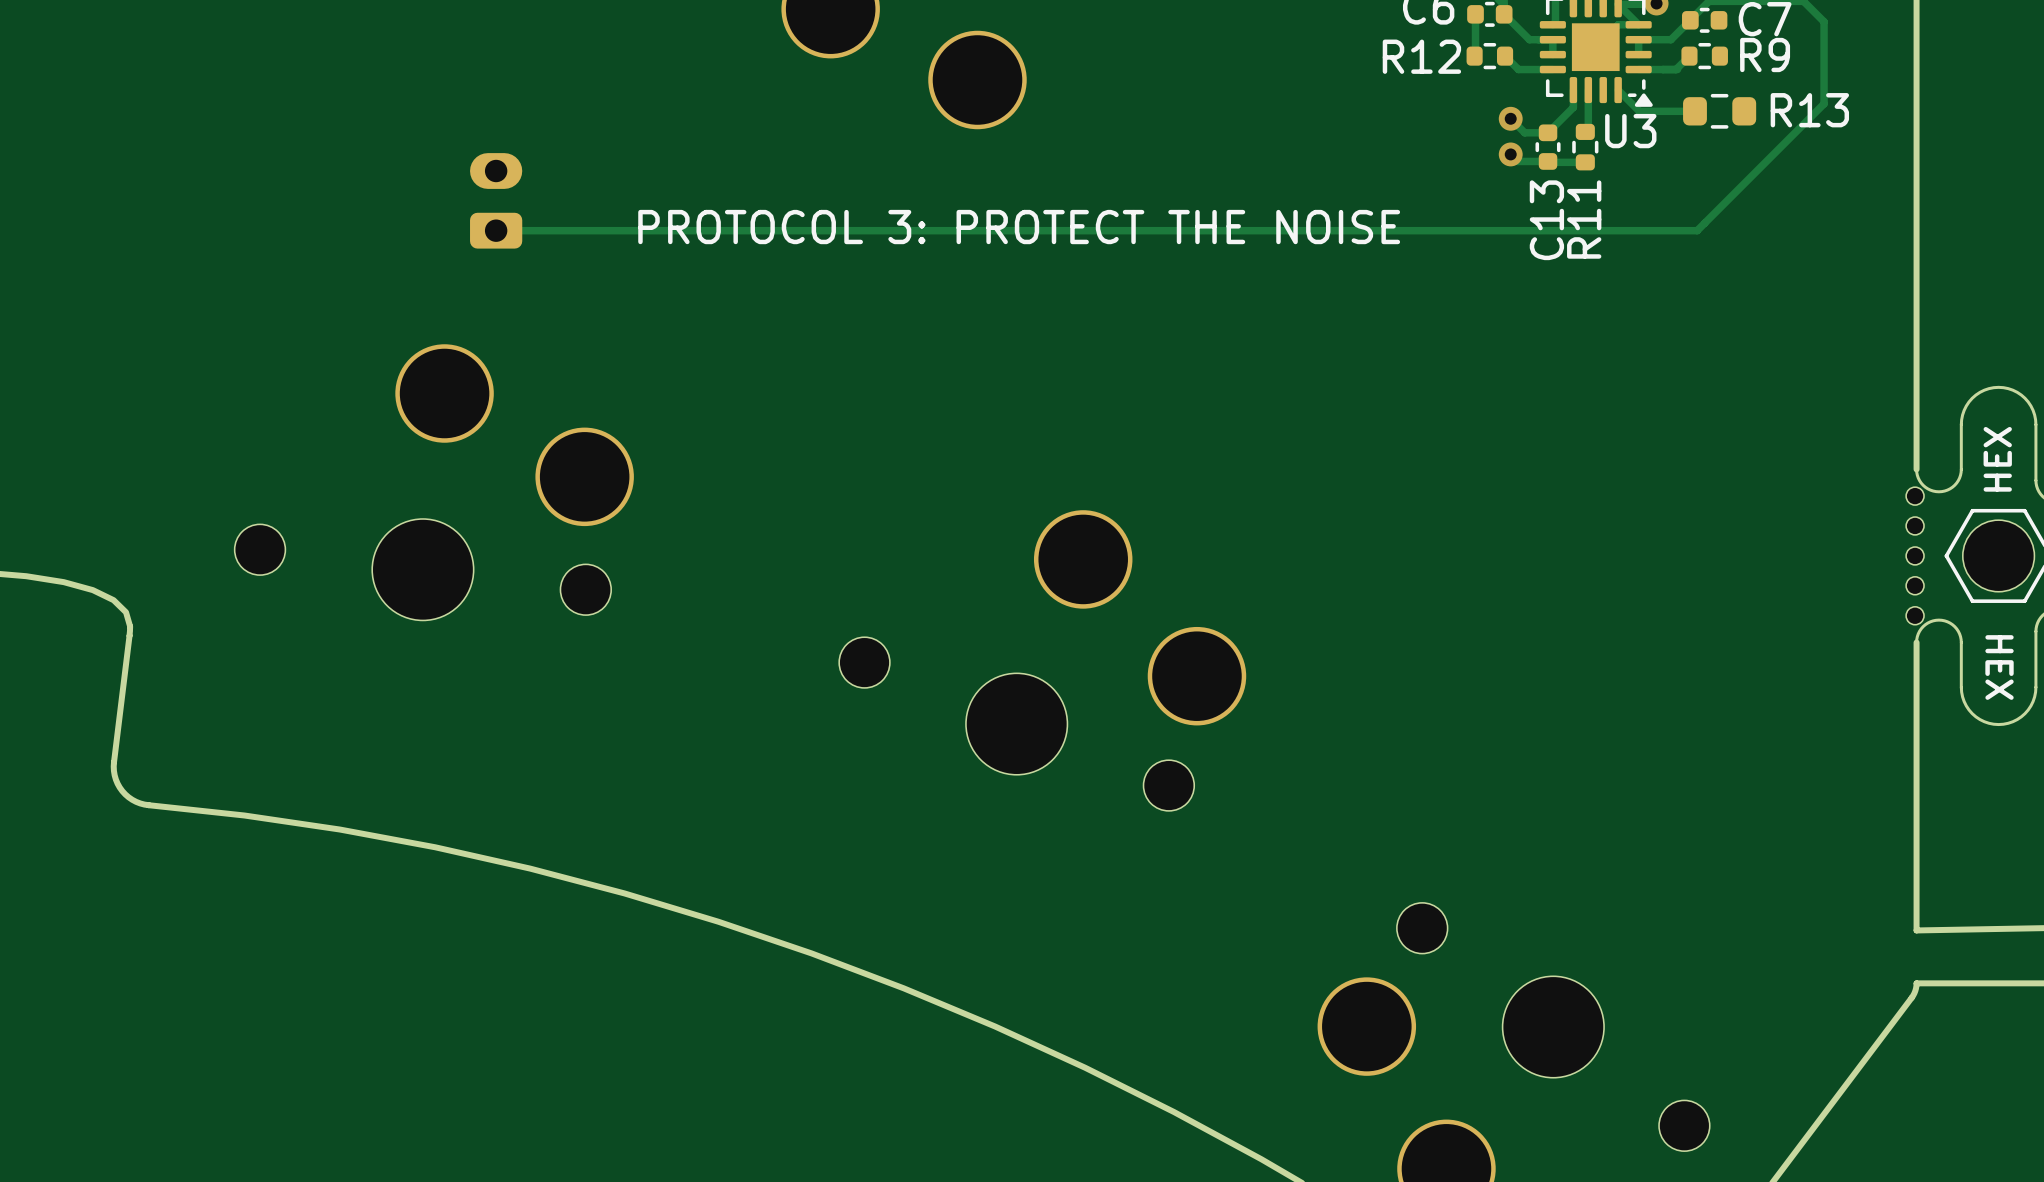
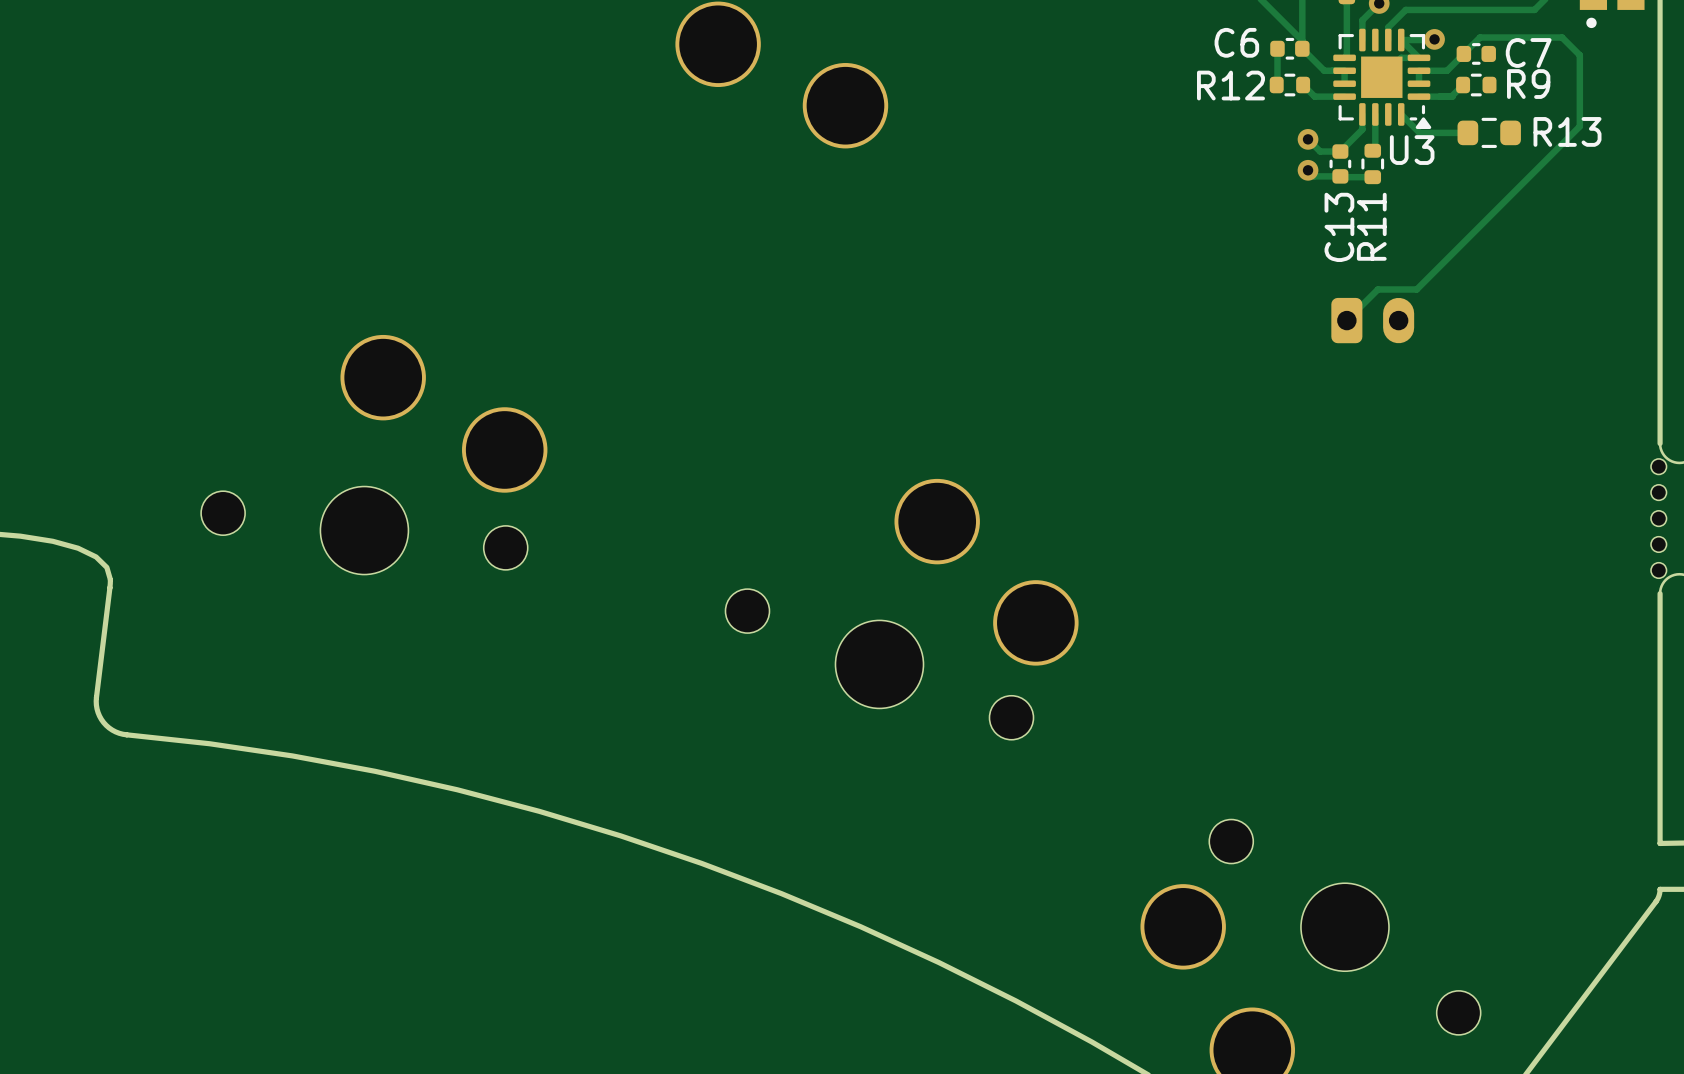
part: (496, 200) -> none
text: PROTOCOL 3: PROTECT THE NOISE (1019, 227) -> none
track: (496, 230) (1697, 230) -> (1346, 320) (1377, 289) (1416, 289) (1469, 236)
part: none -> (1372, 320)

